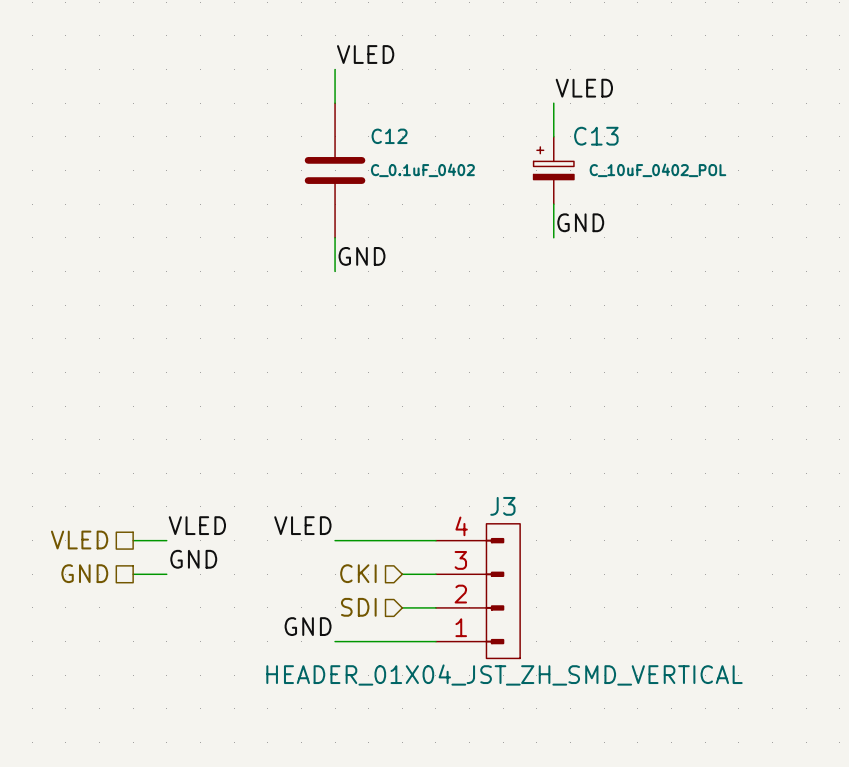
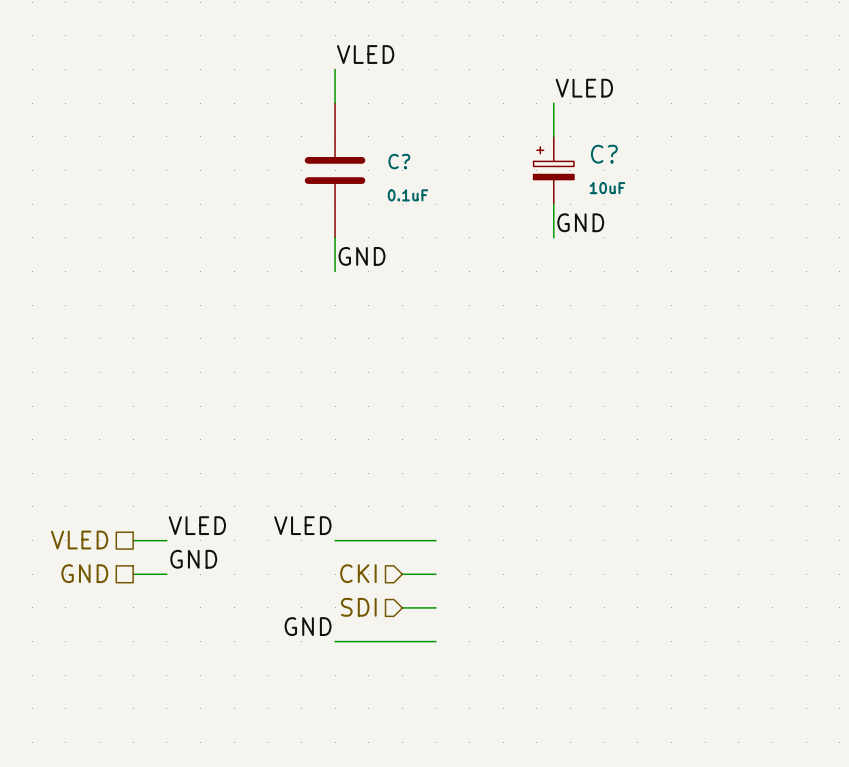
C12 name: C12 (389, 136) -> C? (399, 161)
C13 name: C13 (596, 136) -> C? (604, 154)
C12 value: C_0.1uF_0402 (422, 170) -> 0.1uF (407, 195)
C13 value: C_10uF_0402_POL (657, 170) -> 10uF (607, 188)
J3: HEADER_01X04_JST_ZH_SMD_VERTICAL (478, 591) -> none

